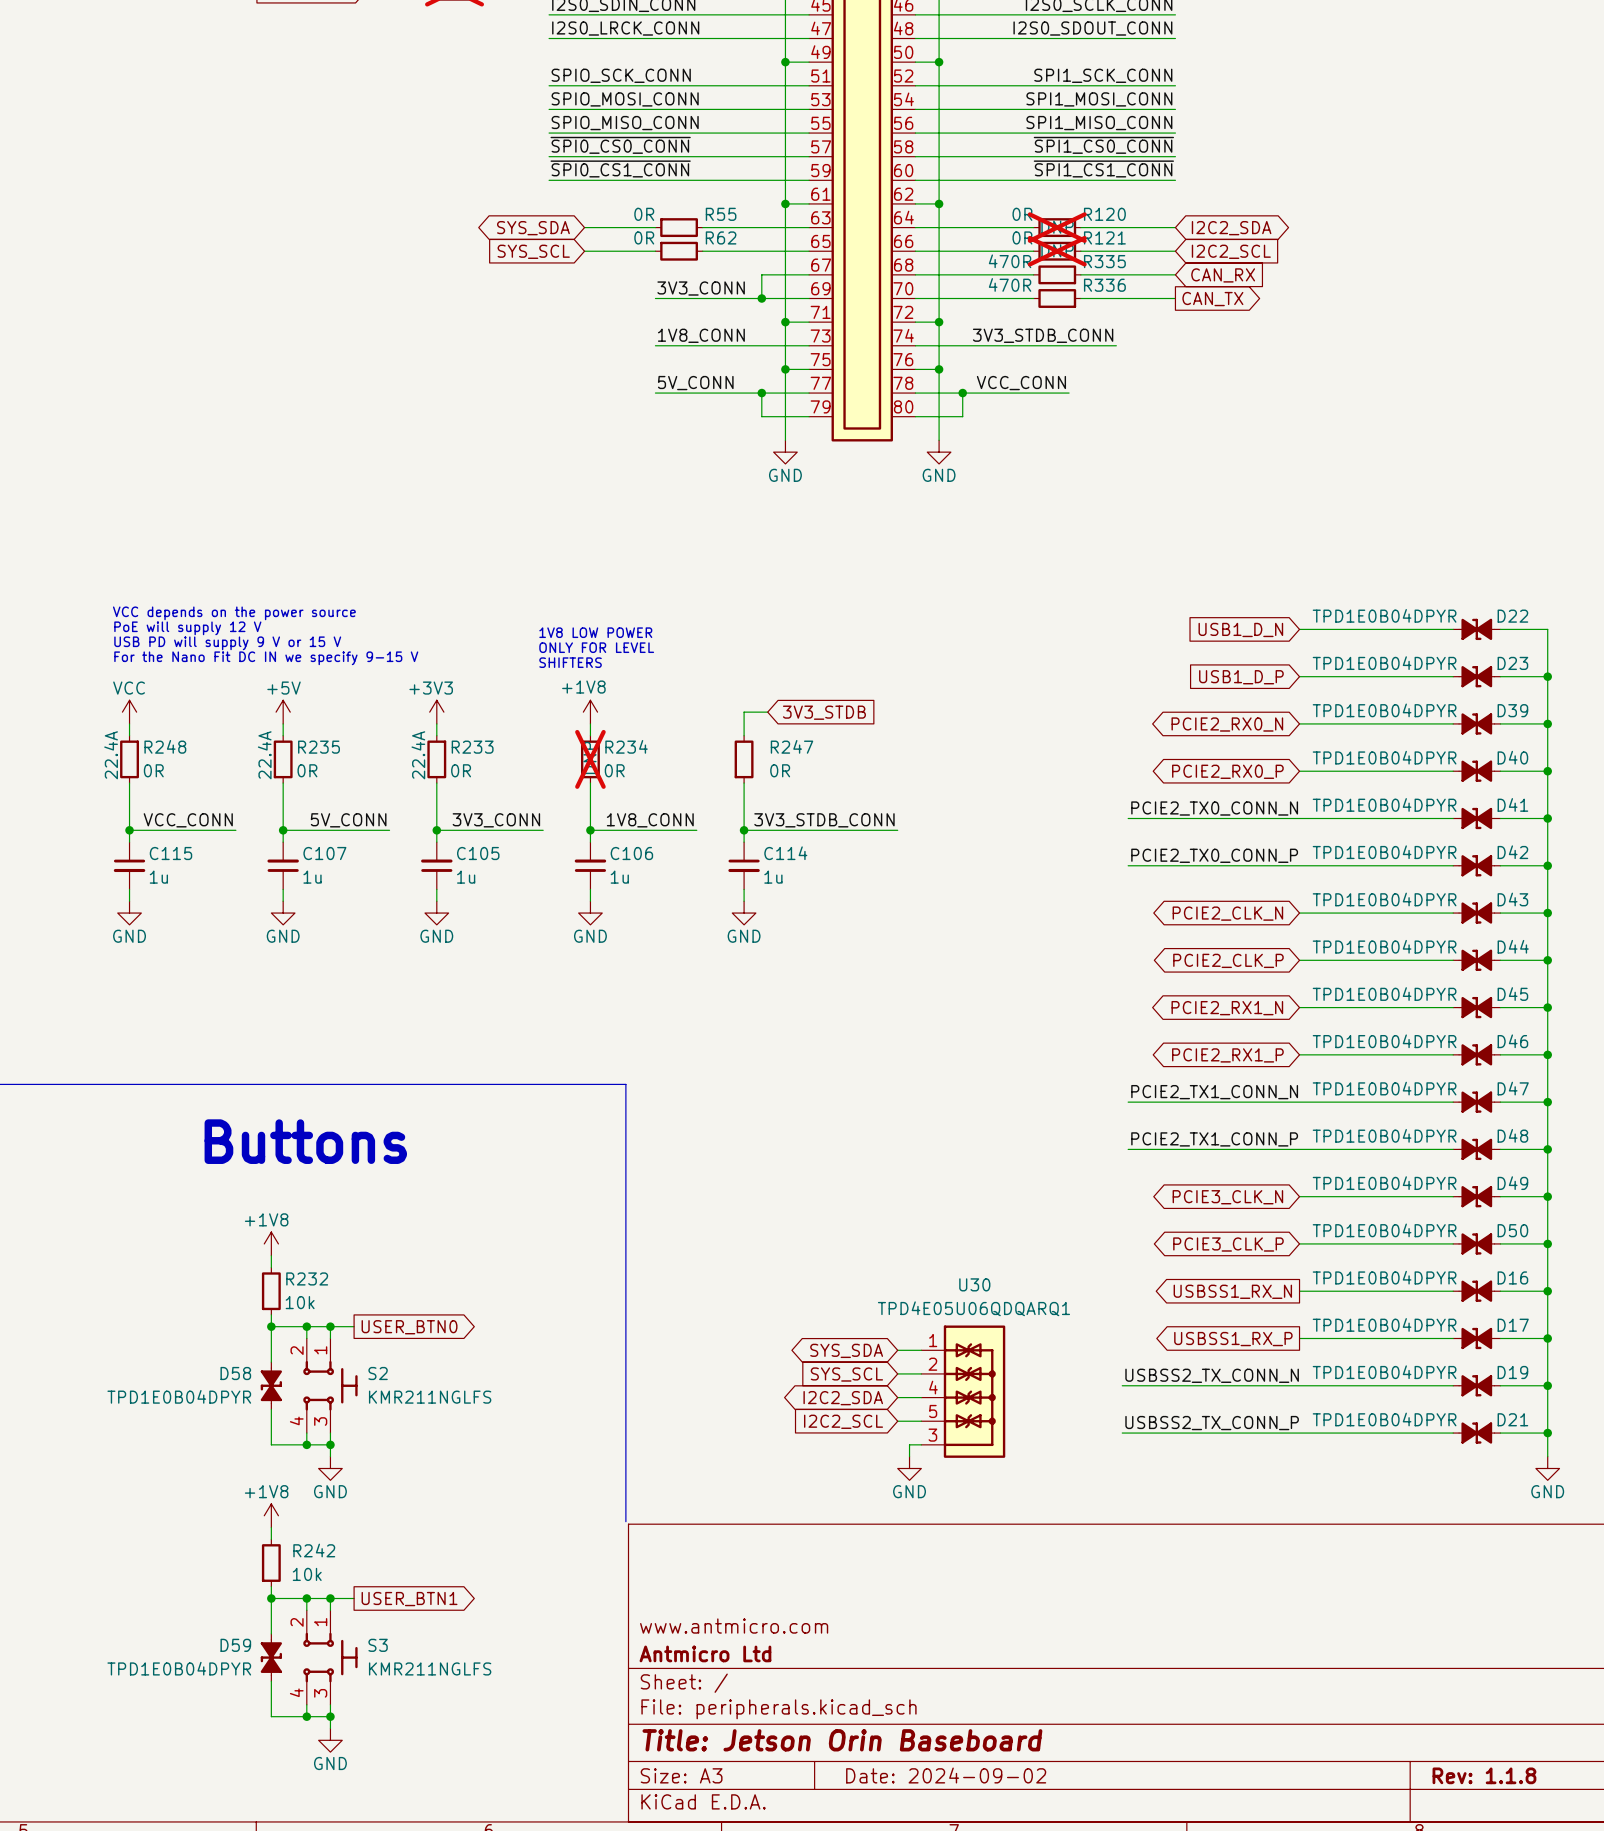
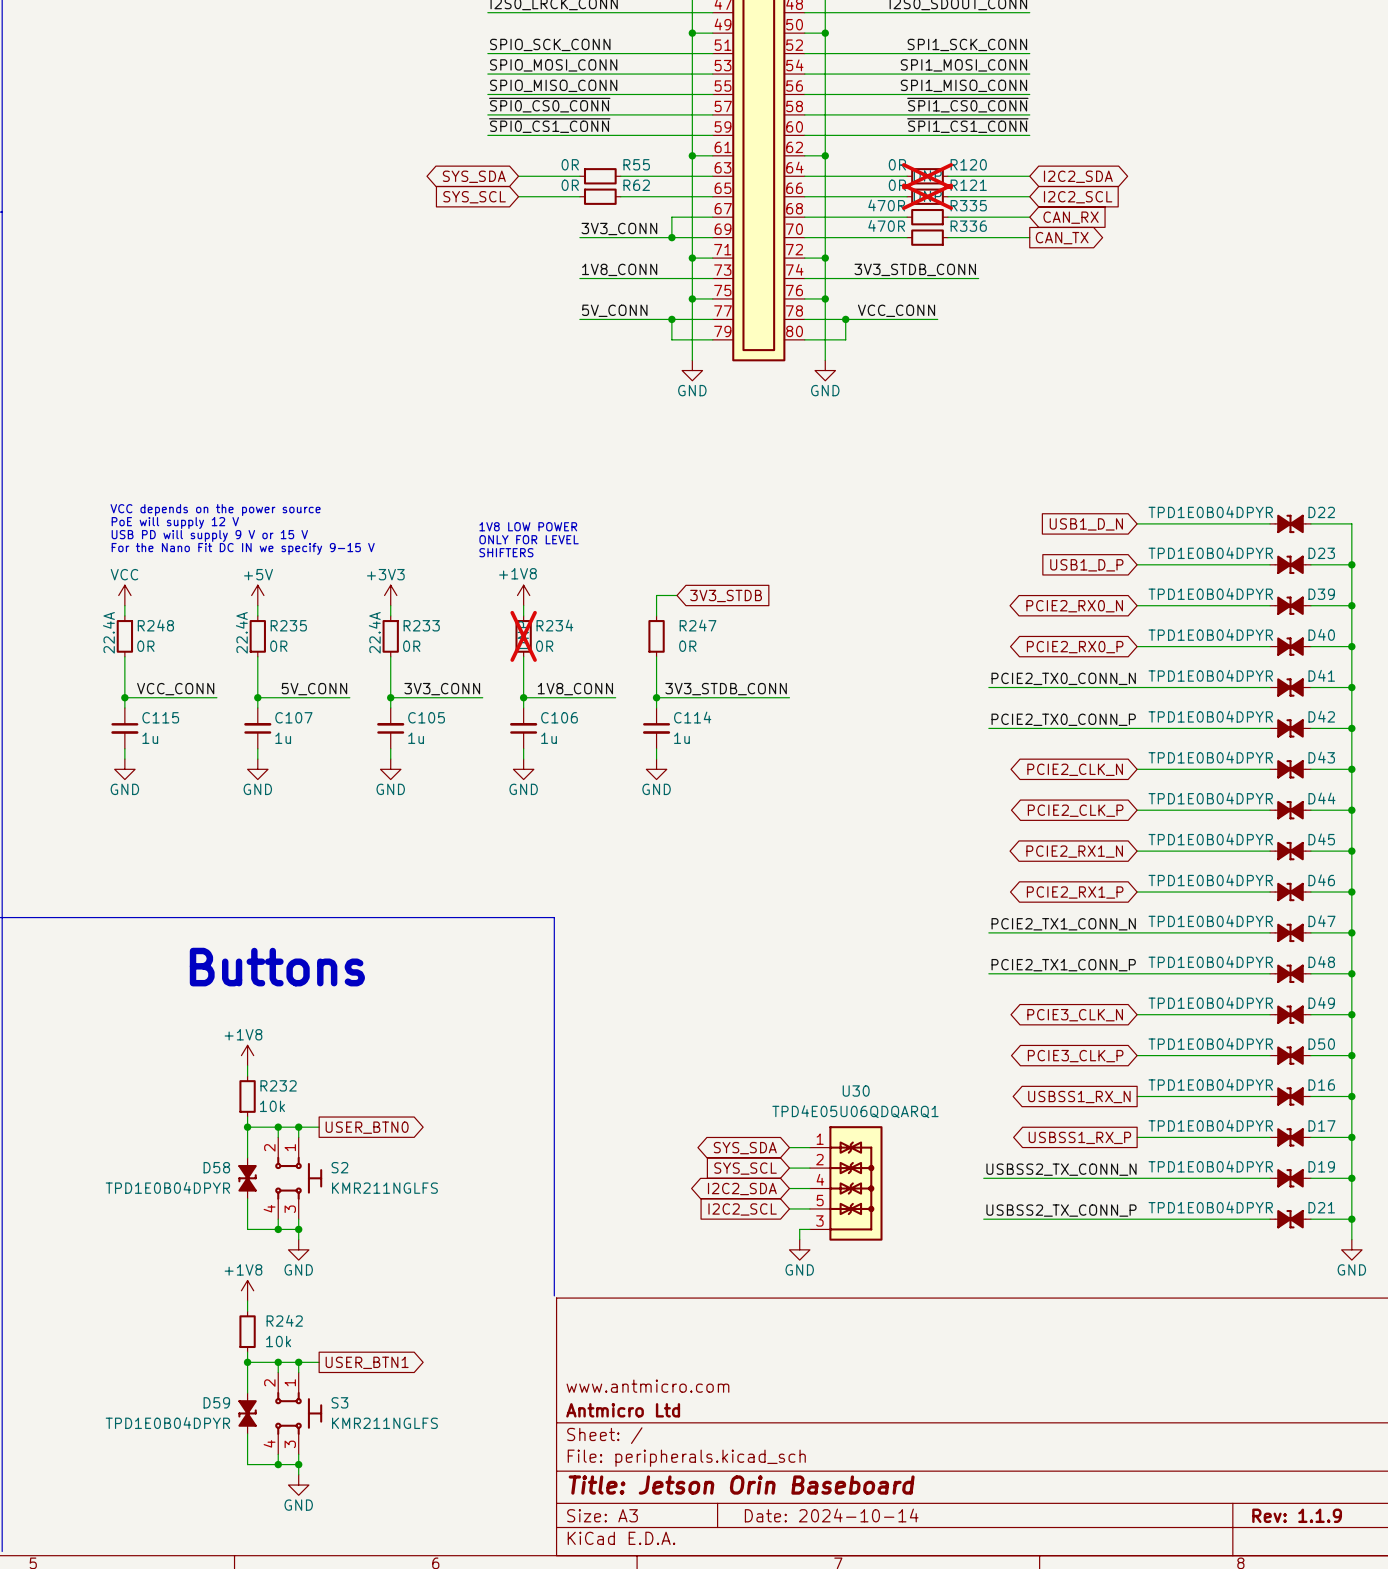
title block: Date: 2024-09-02 (946, 1775) -> Date: 2024-10-14 (831, 1515)
title block: Rev: 1.1.8 (1484, 1775) -> Rev: 1.1.9 (1297, 1515)

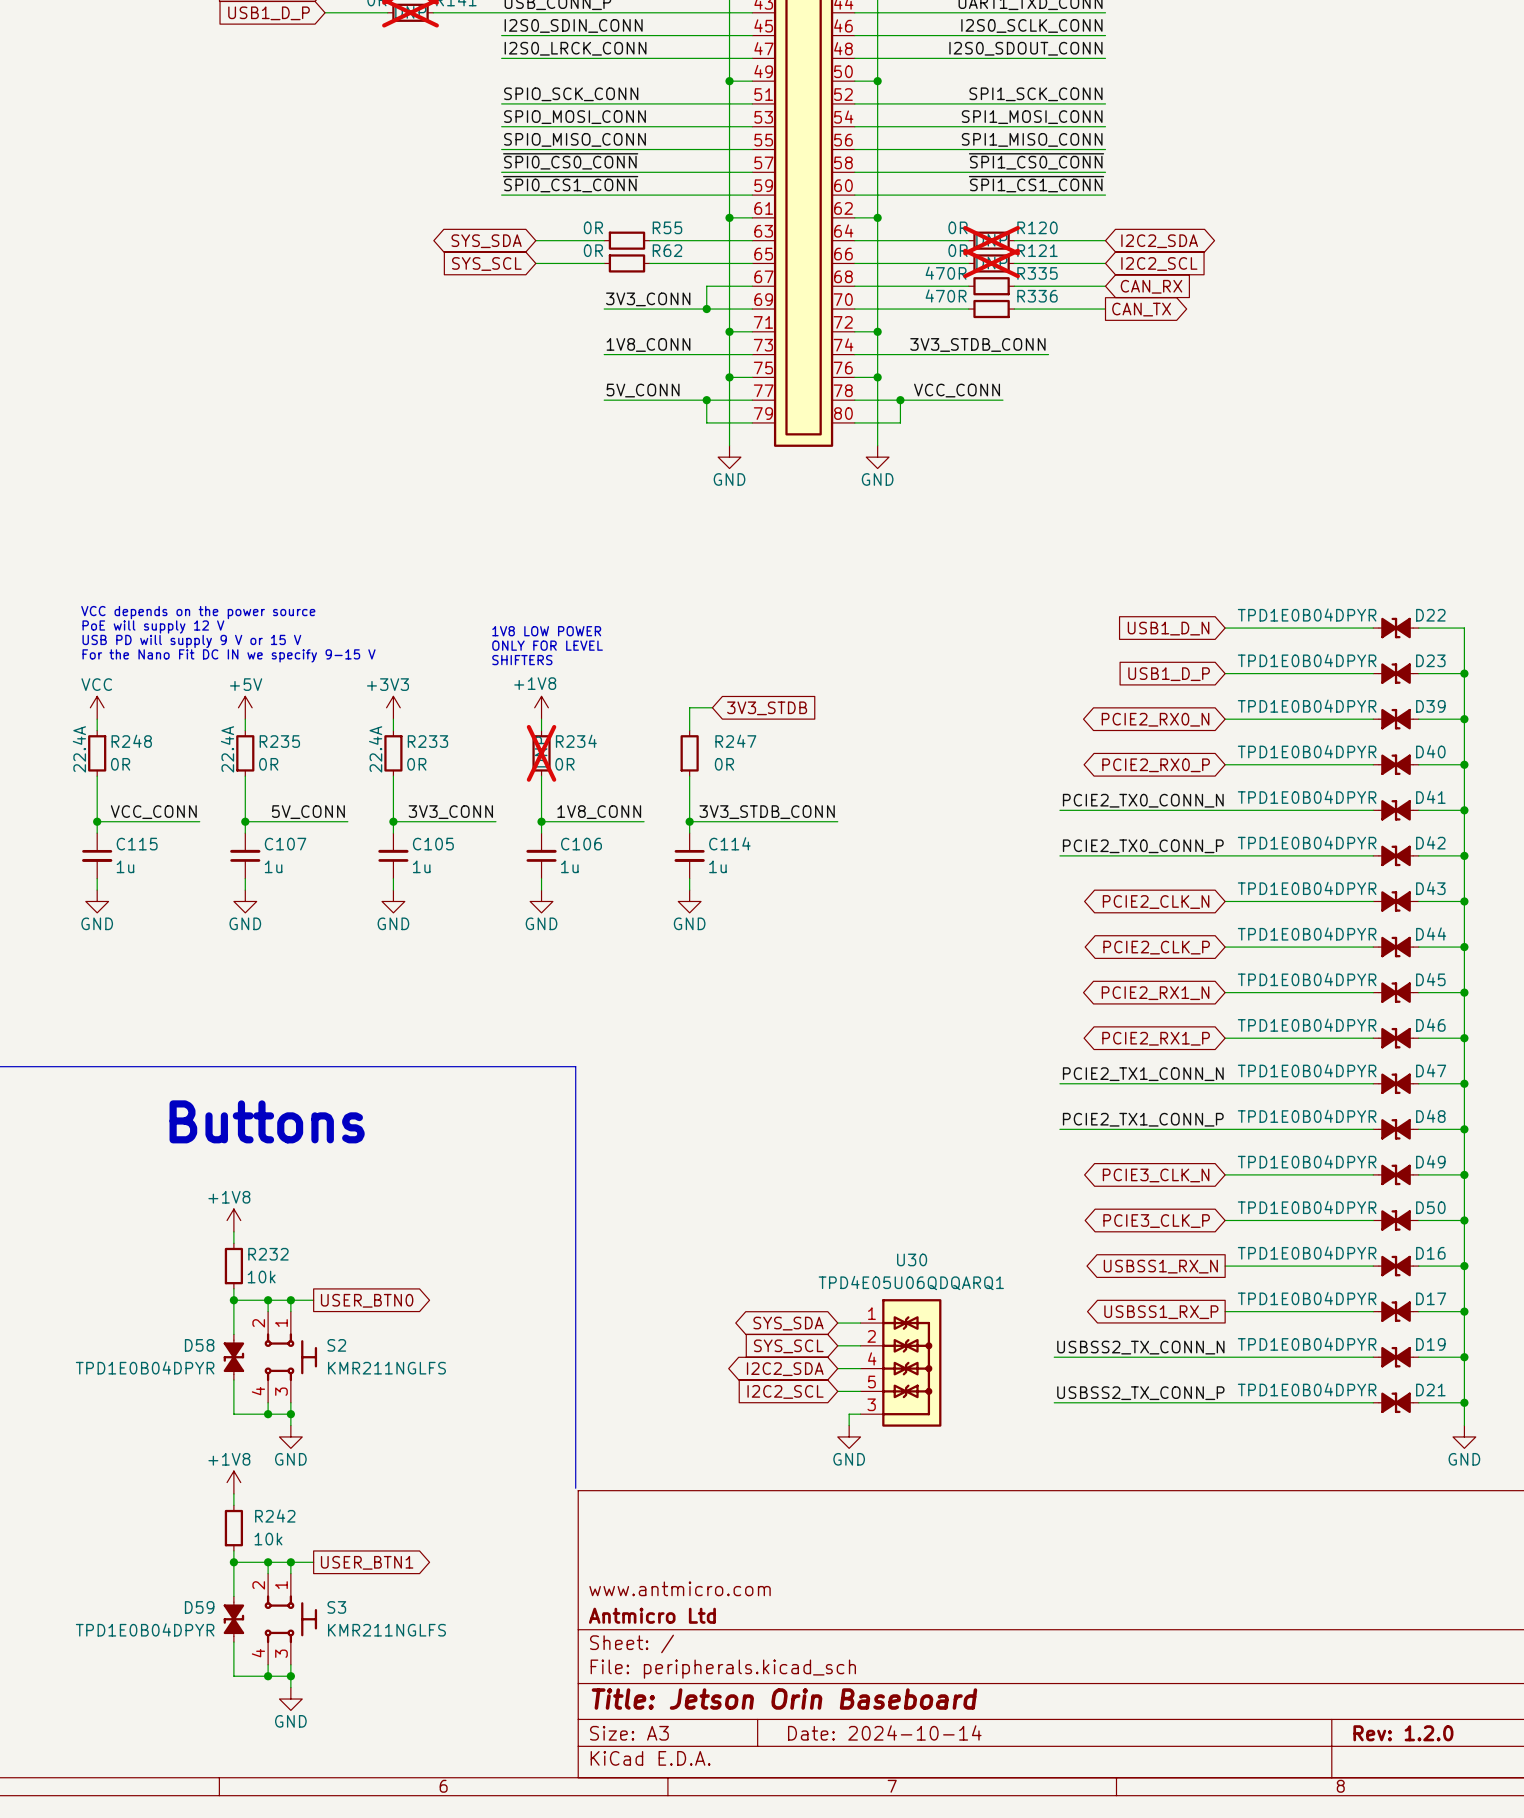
title block: Rev: 1.1.9 (1297, 1515) -> Rev: 1.2.0 (1403, 1733)

